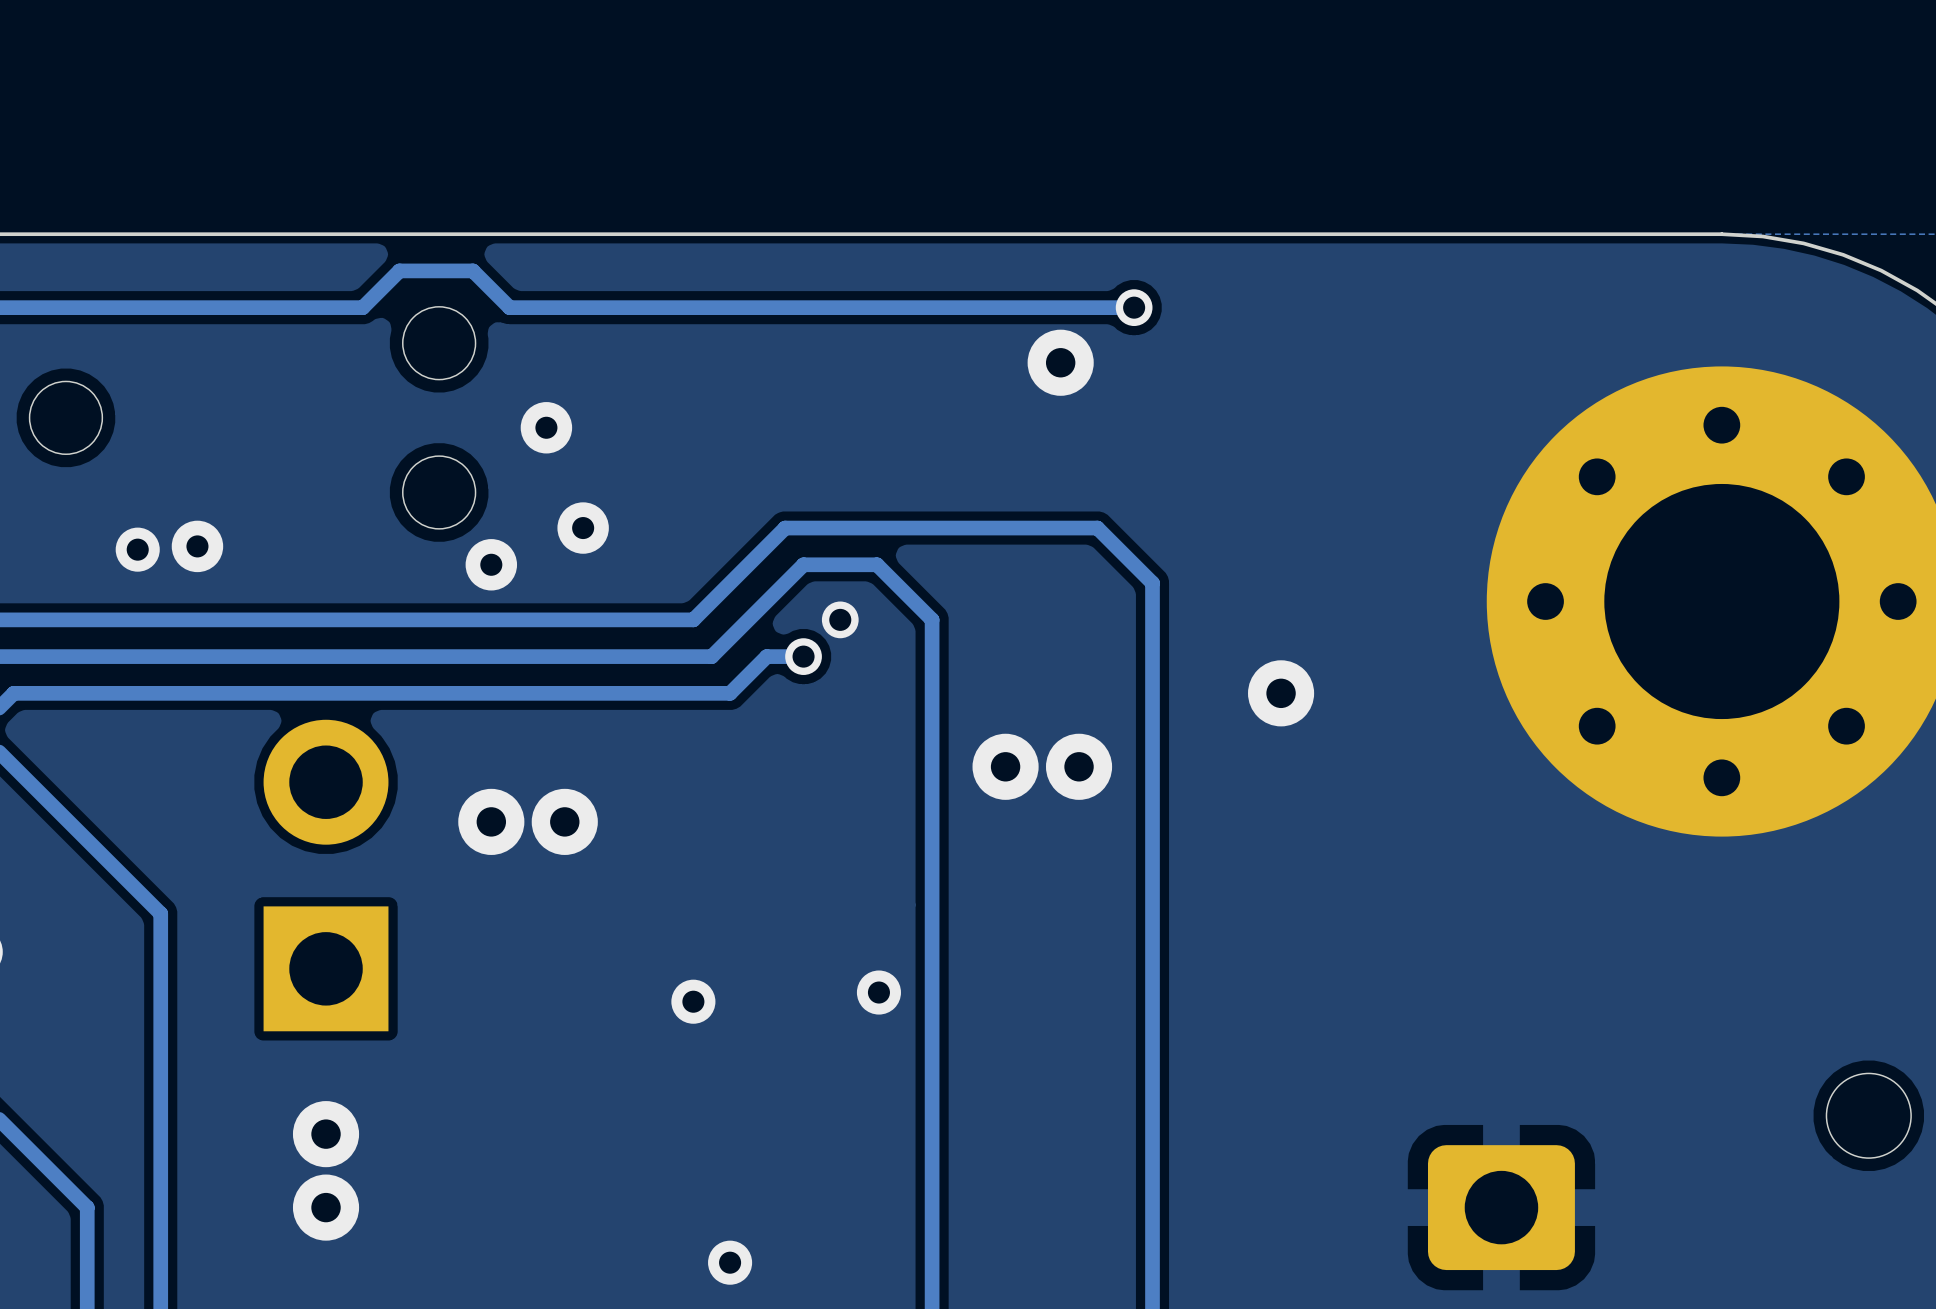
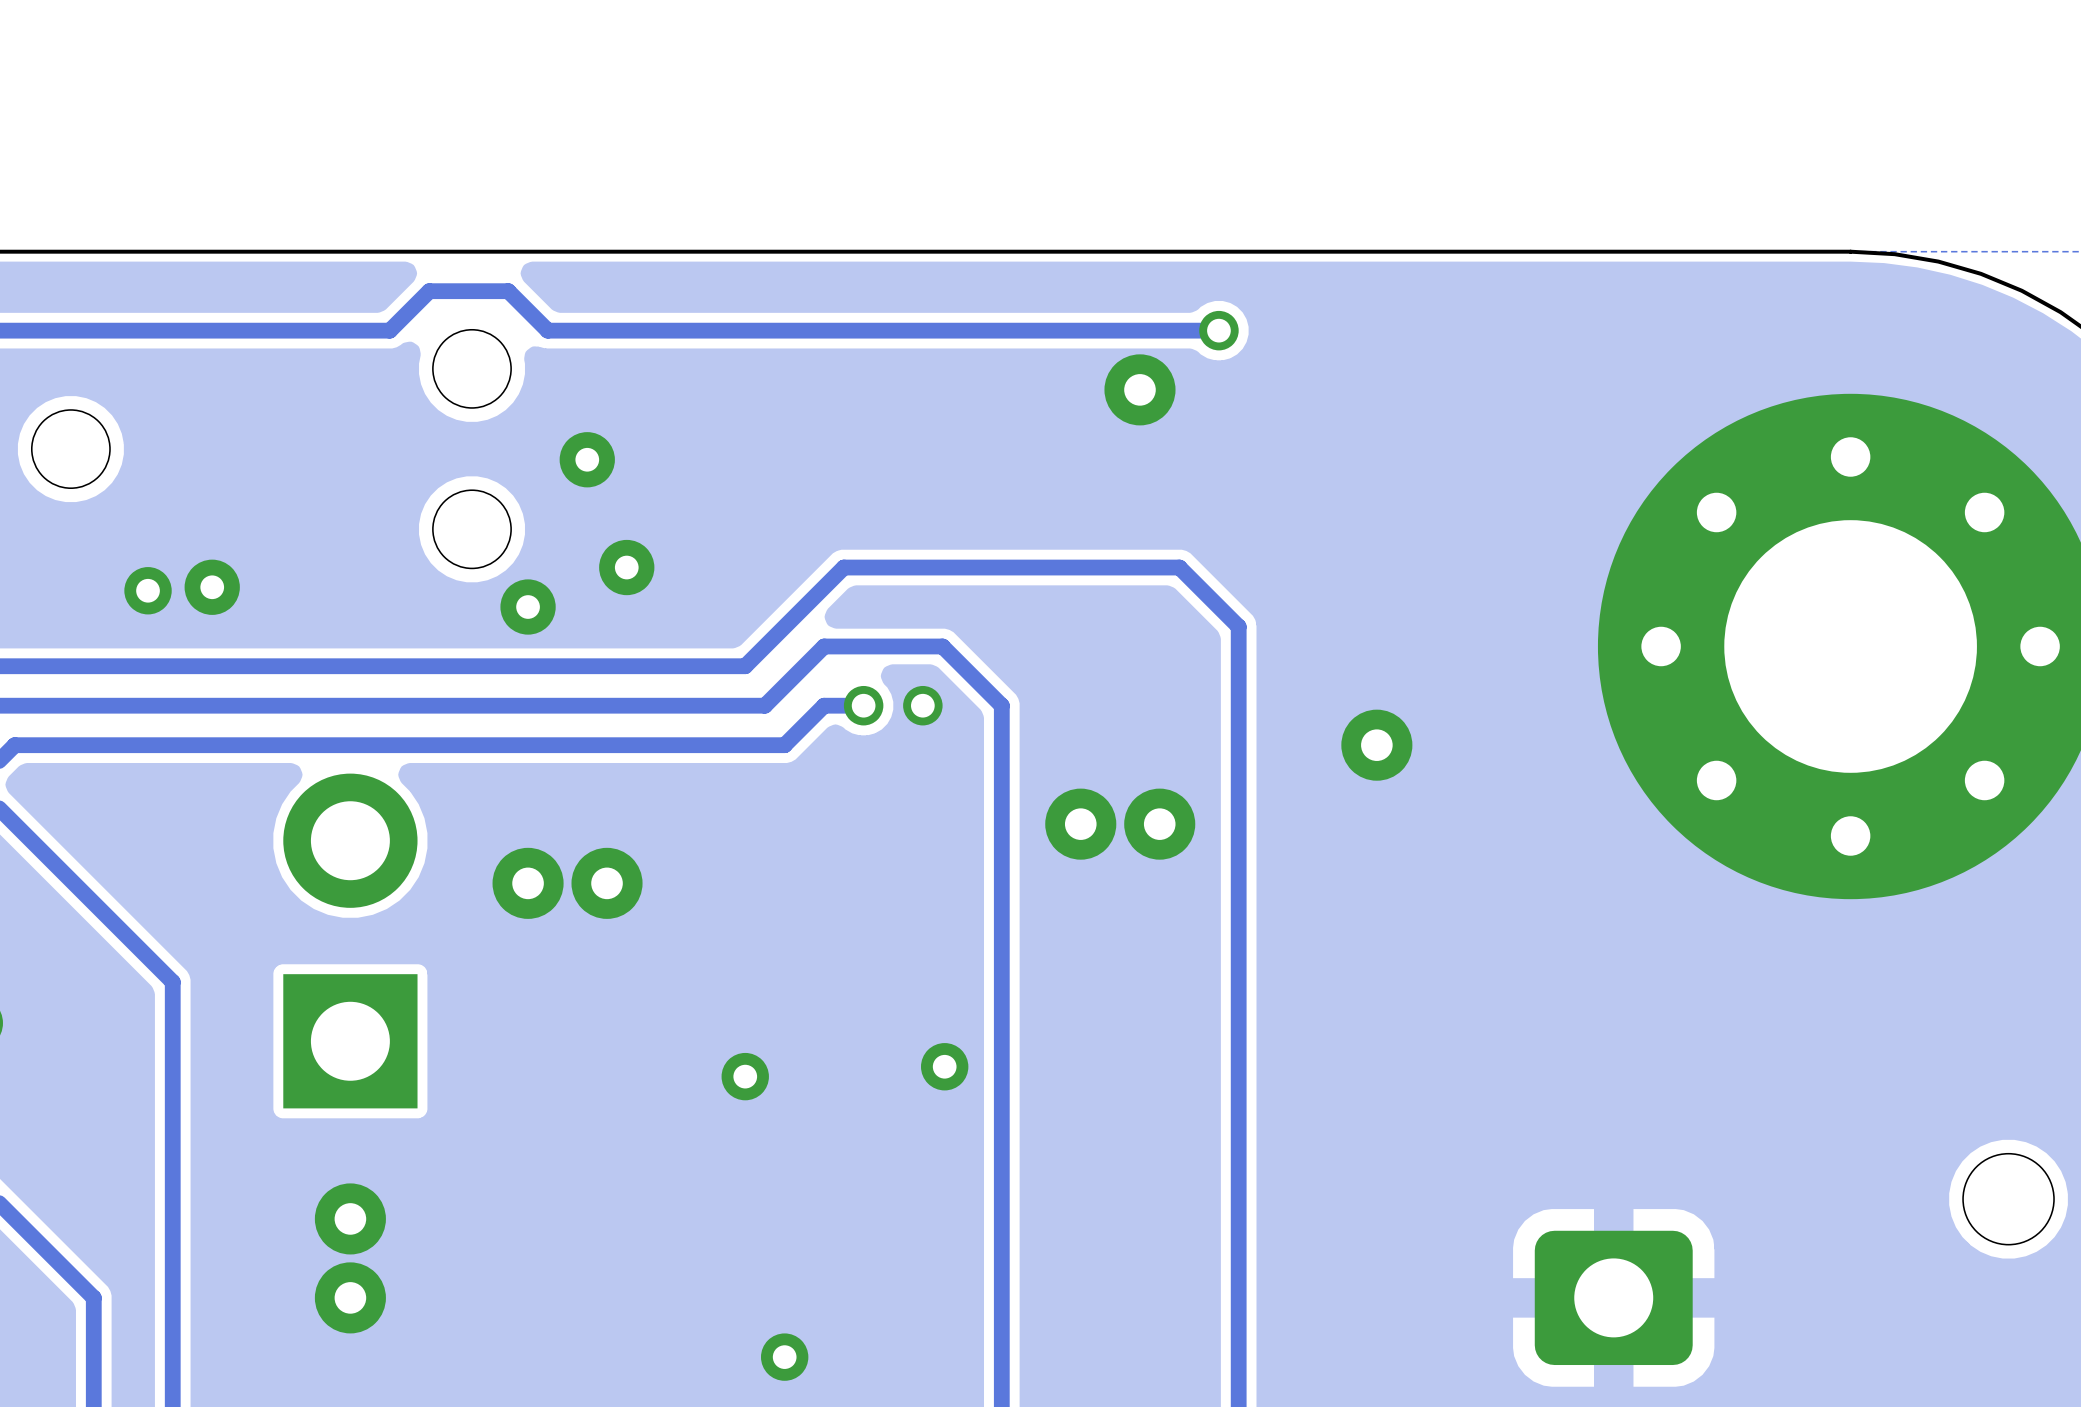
track: (766, 601) (803, 564) (877, 564) (932, 619) (932, 656) -> (824, 646) (942, 646) (1001, 705)
via position: (840, 619) -> (922, 705)

